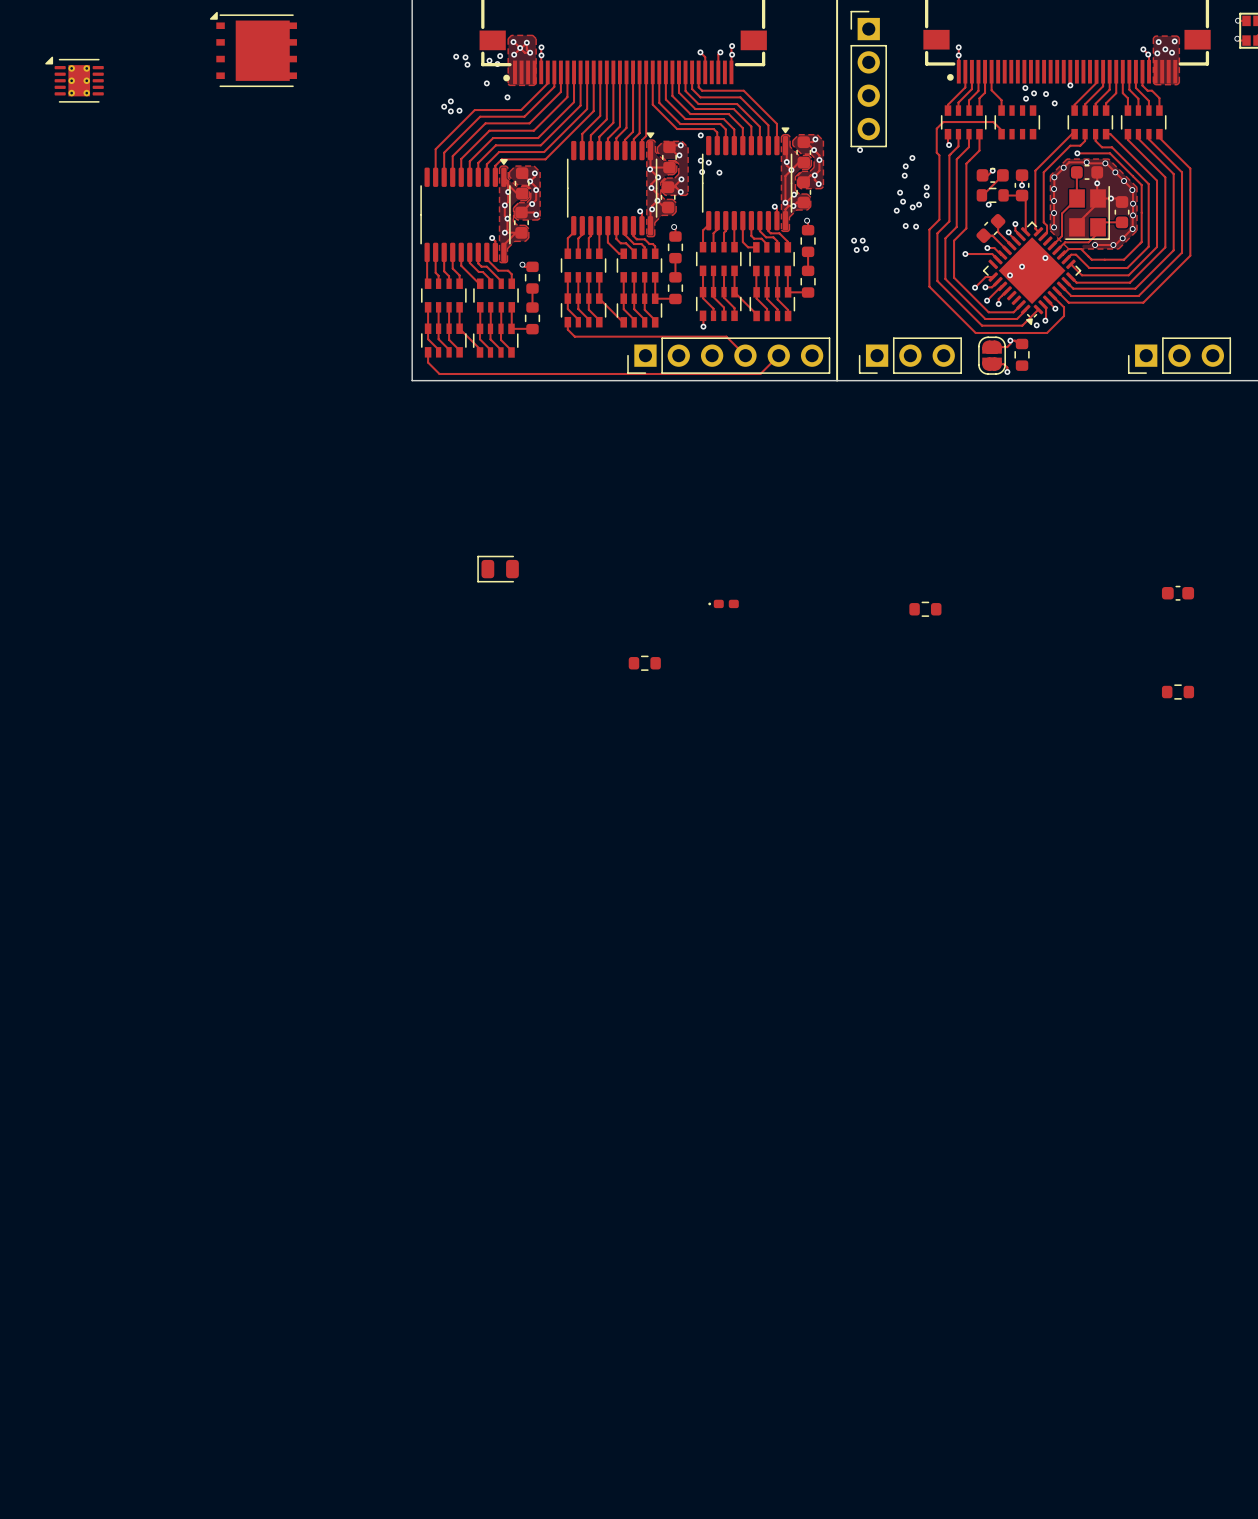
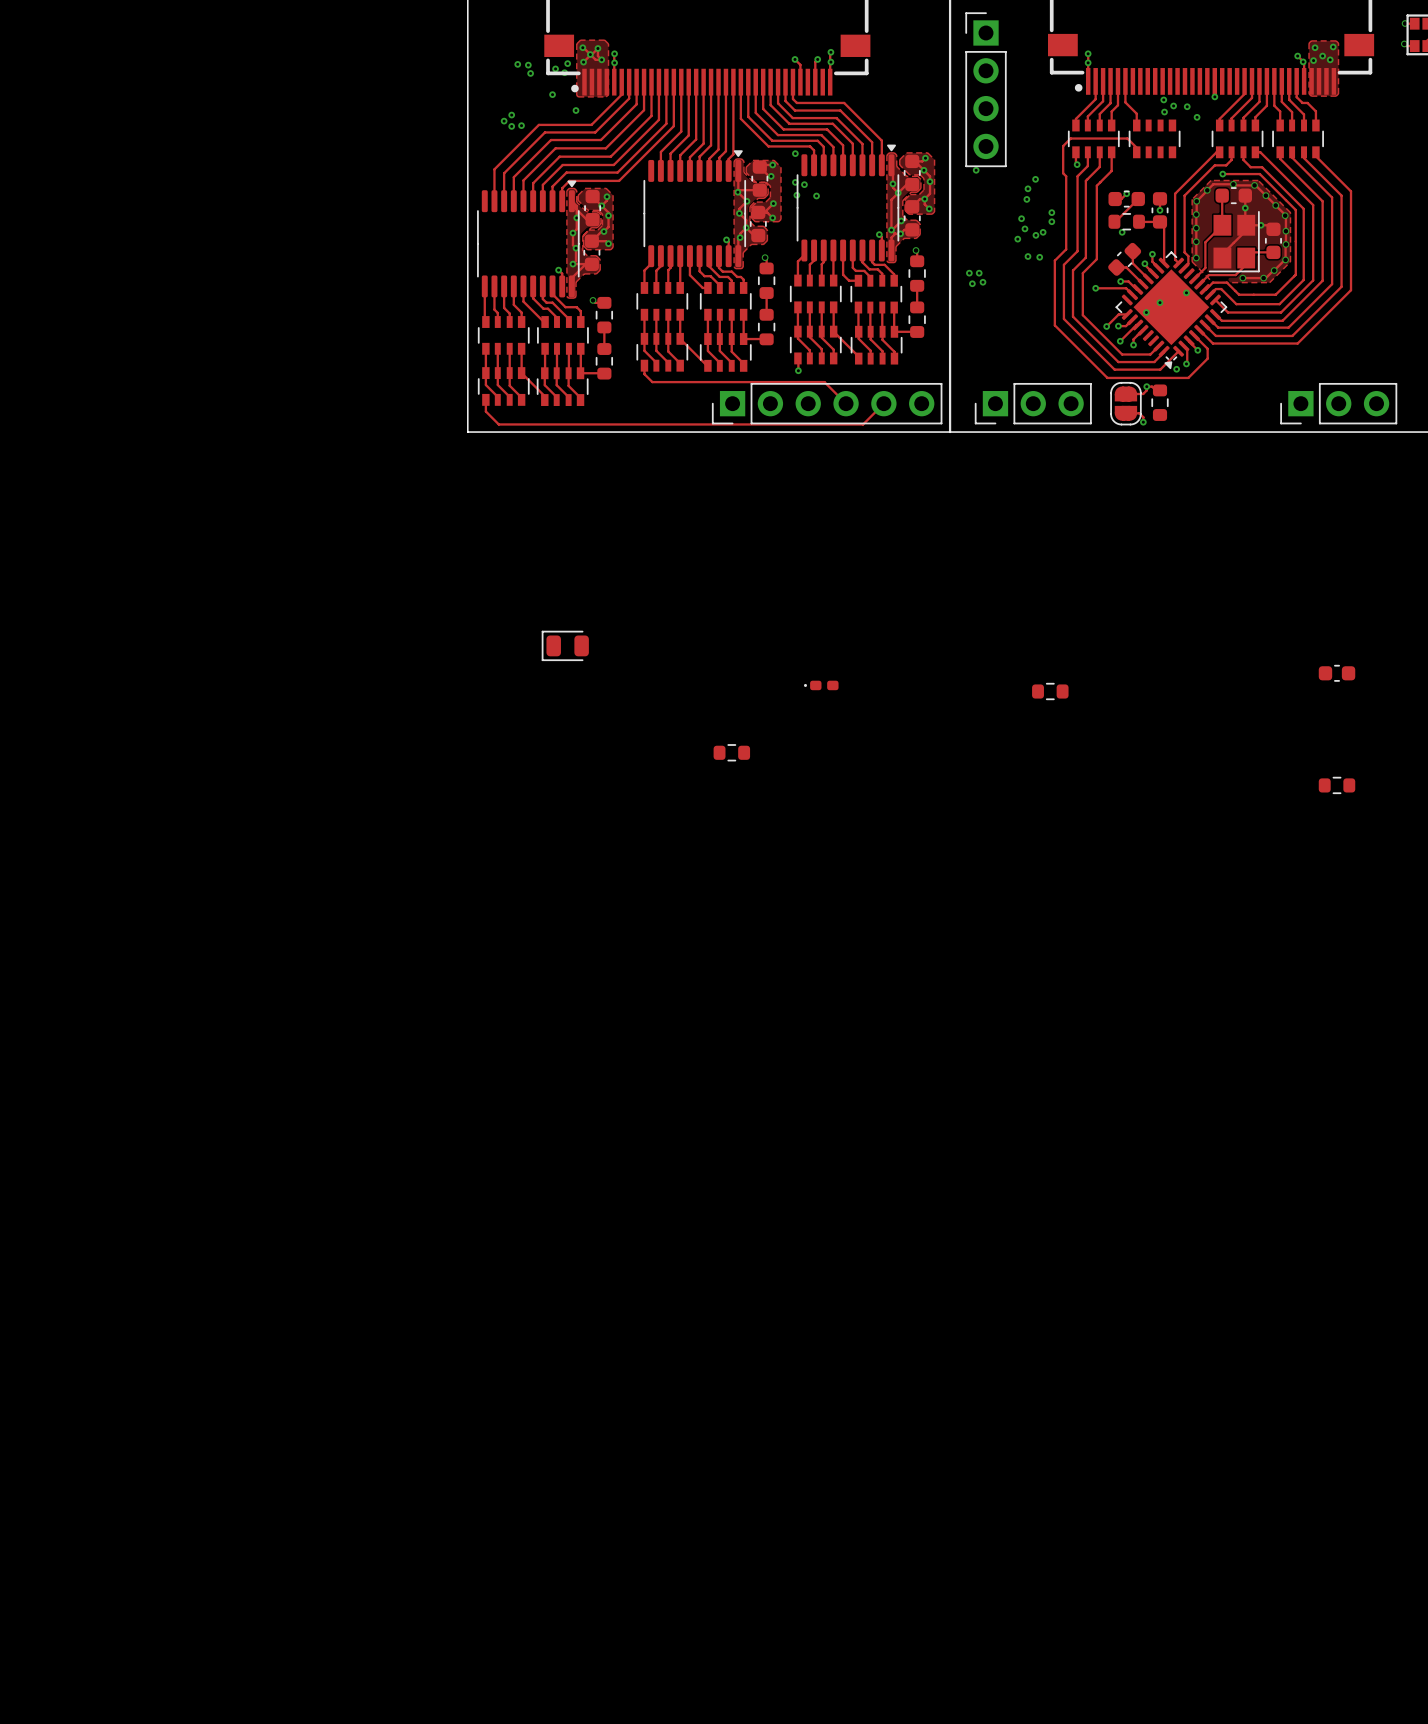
part: (253, 49) -> none
part: (74, 79) -> none

